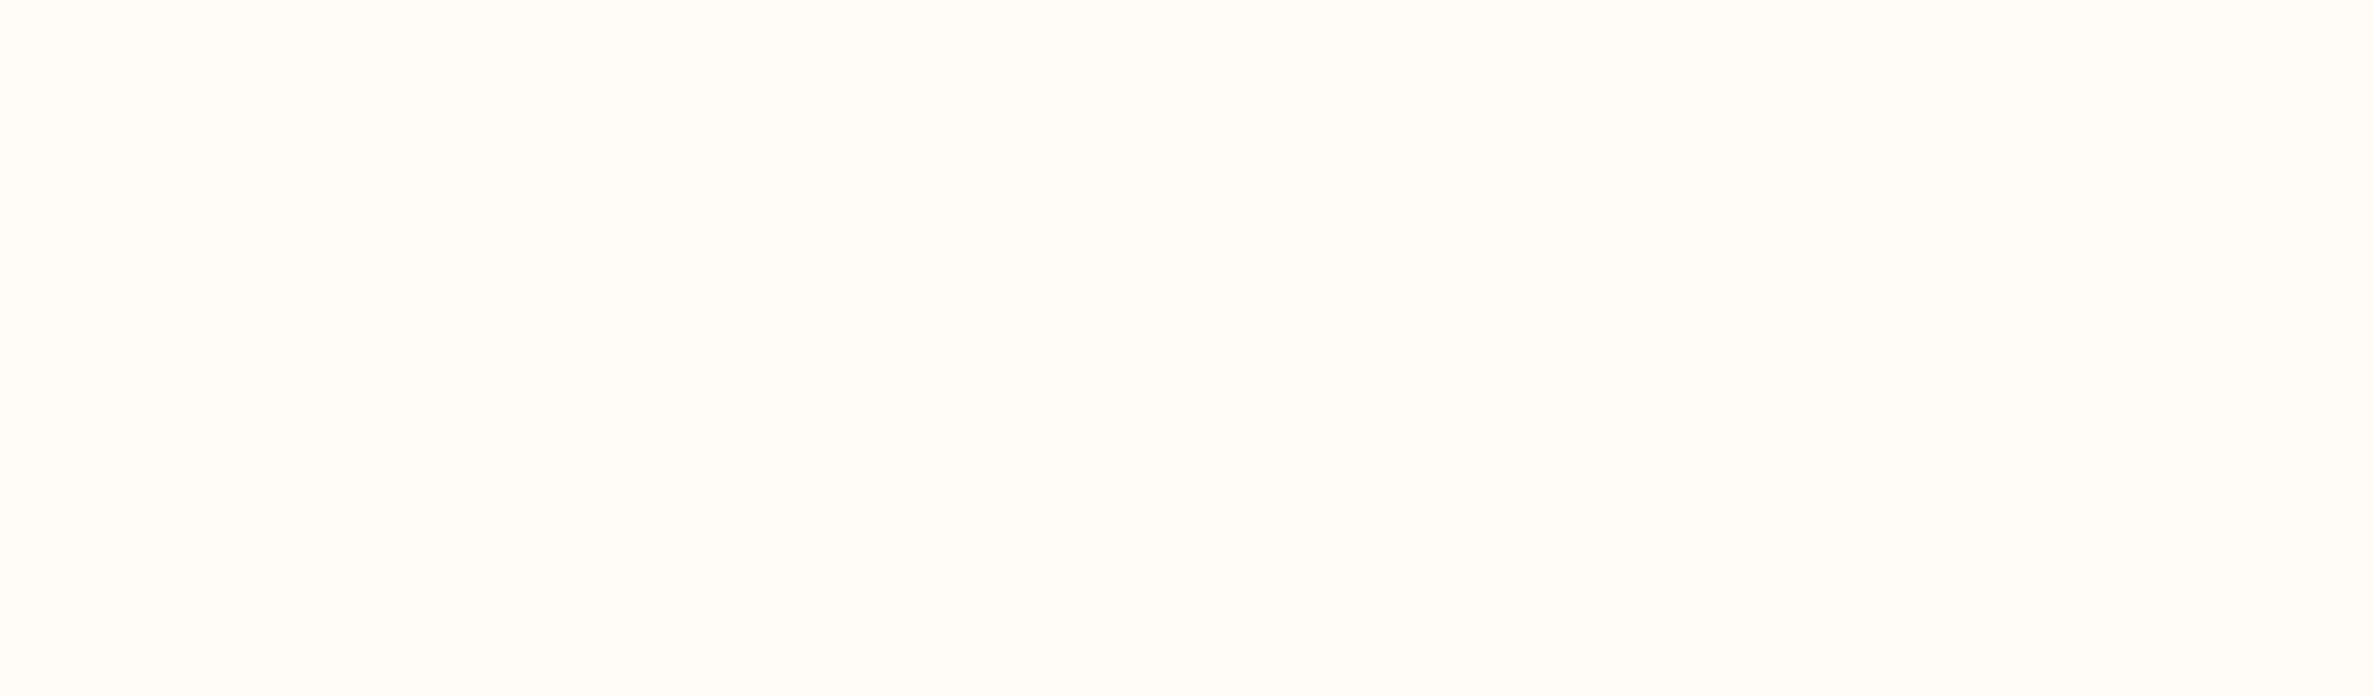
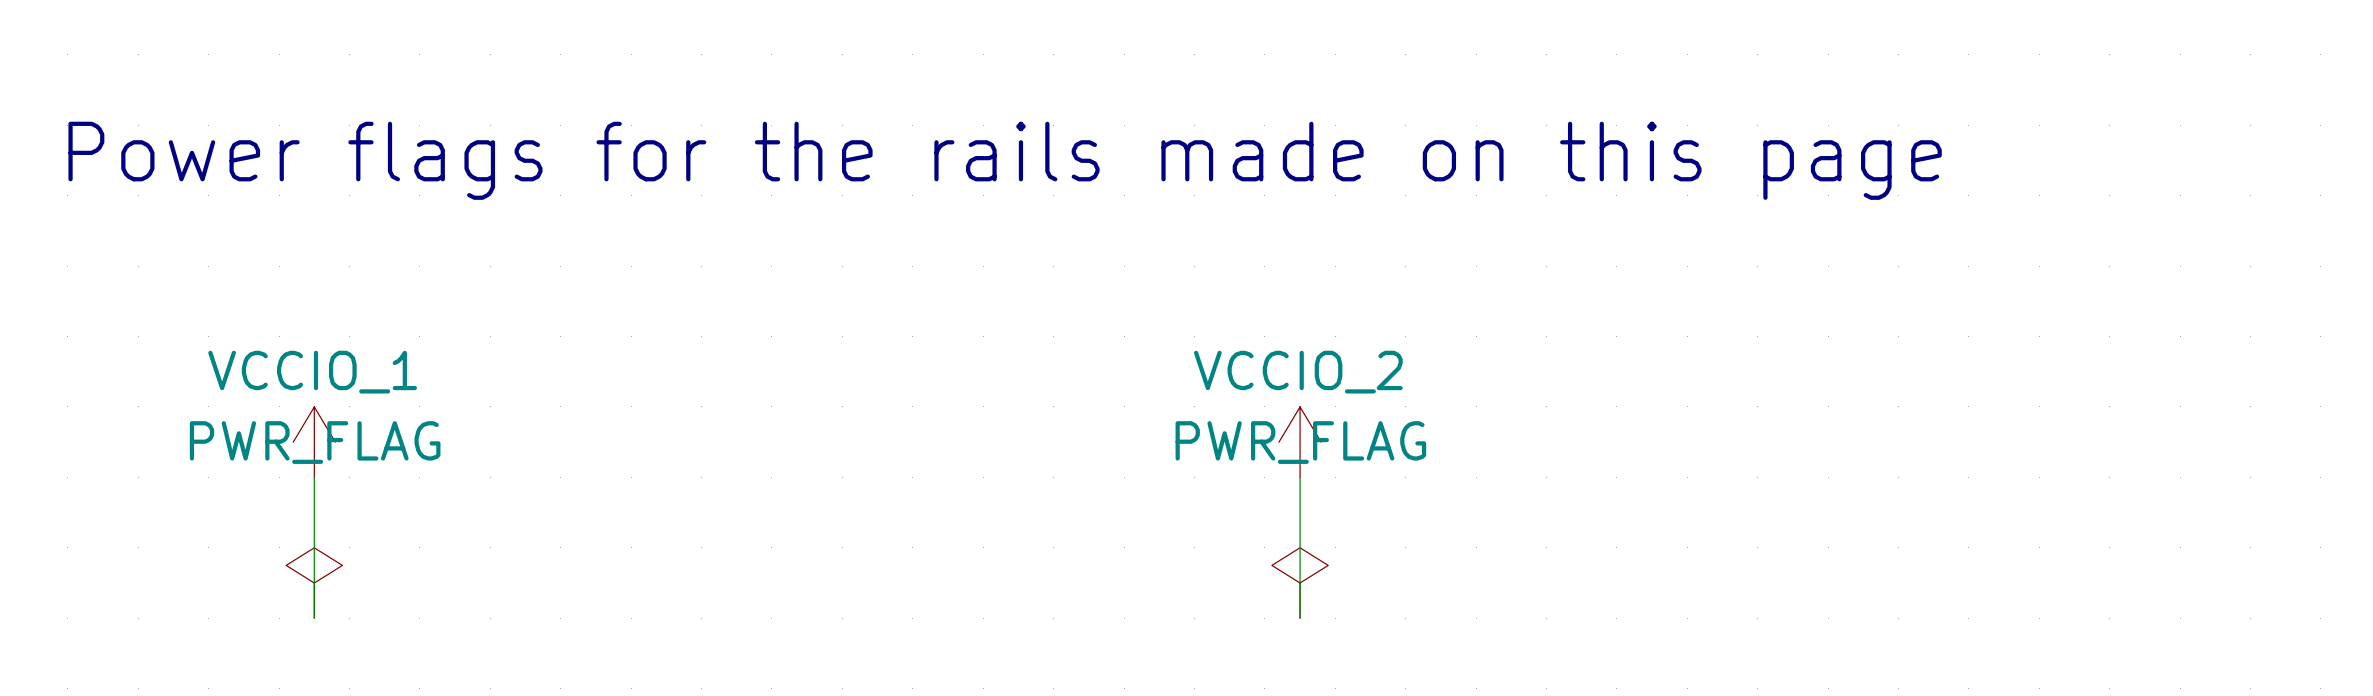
text: none -> Power flags for the rails made on this page (1005, 160)
power symbol: none -> VCCIO_1 (314, 442)
power symbol: none -> VCCIO_2 (1300, 442)
wire: none -> (314, 477) (314, 618)
wire: none -> (1300, 477) (1300, 618)
power symbol: none -> PWR_FLAG (314, 583)
power symbol: none -> PWR_FLAG (1300, 583)

